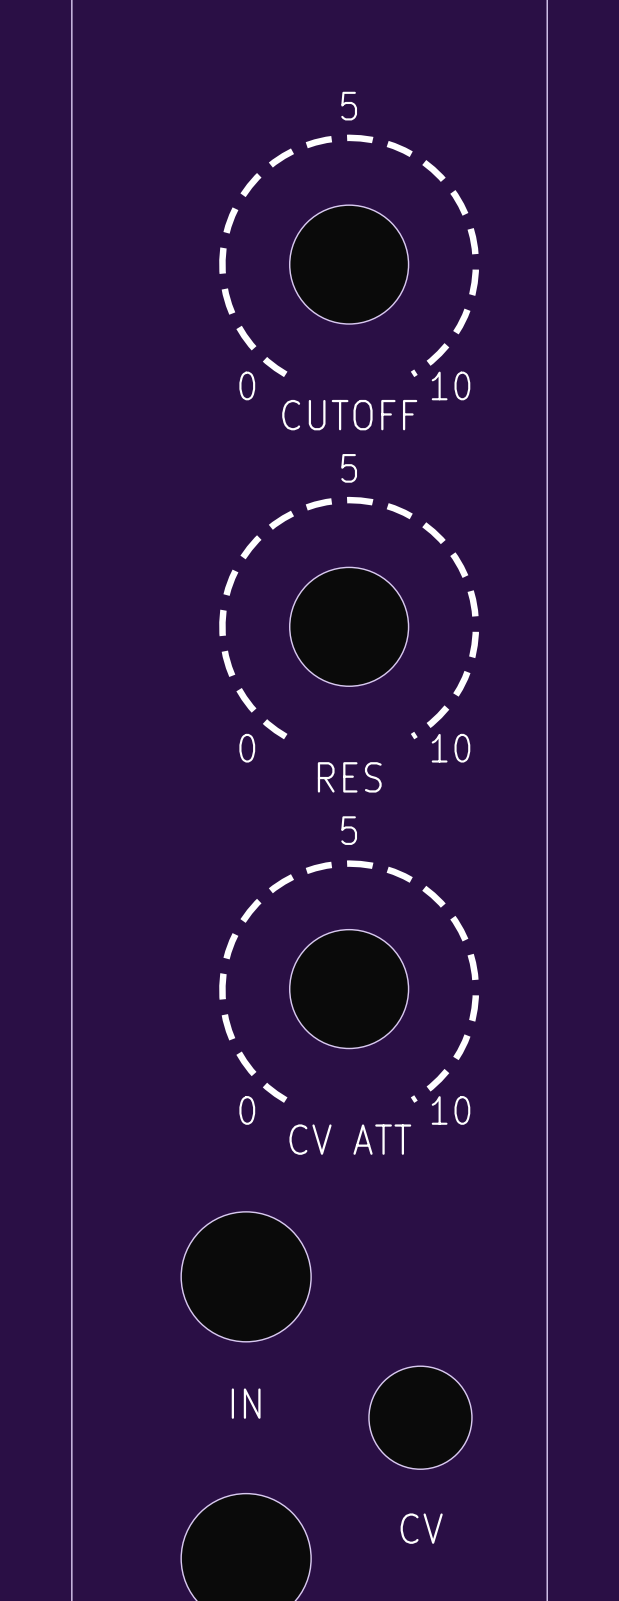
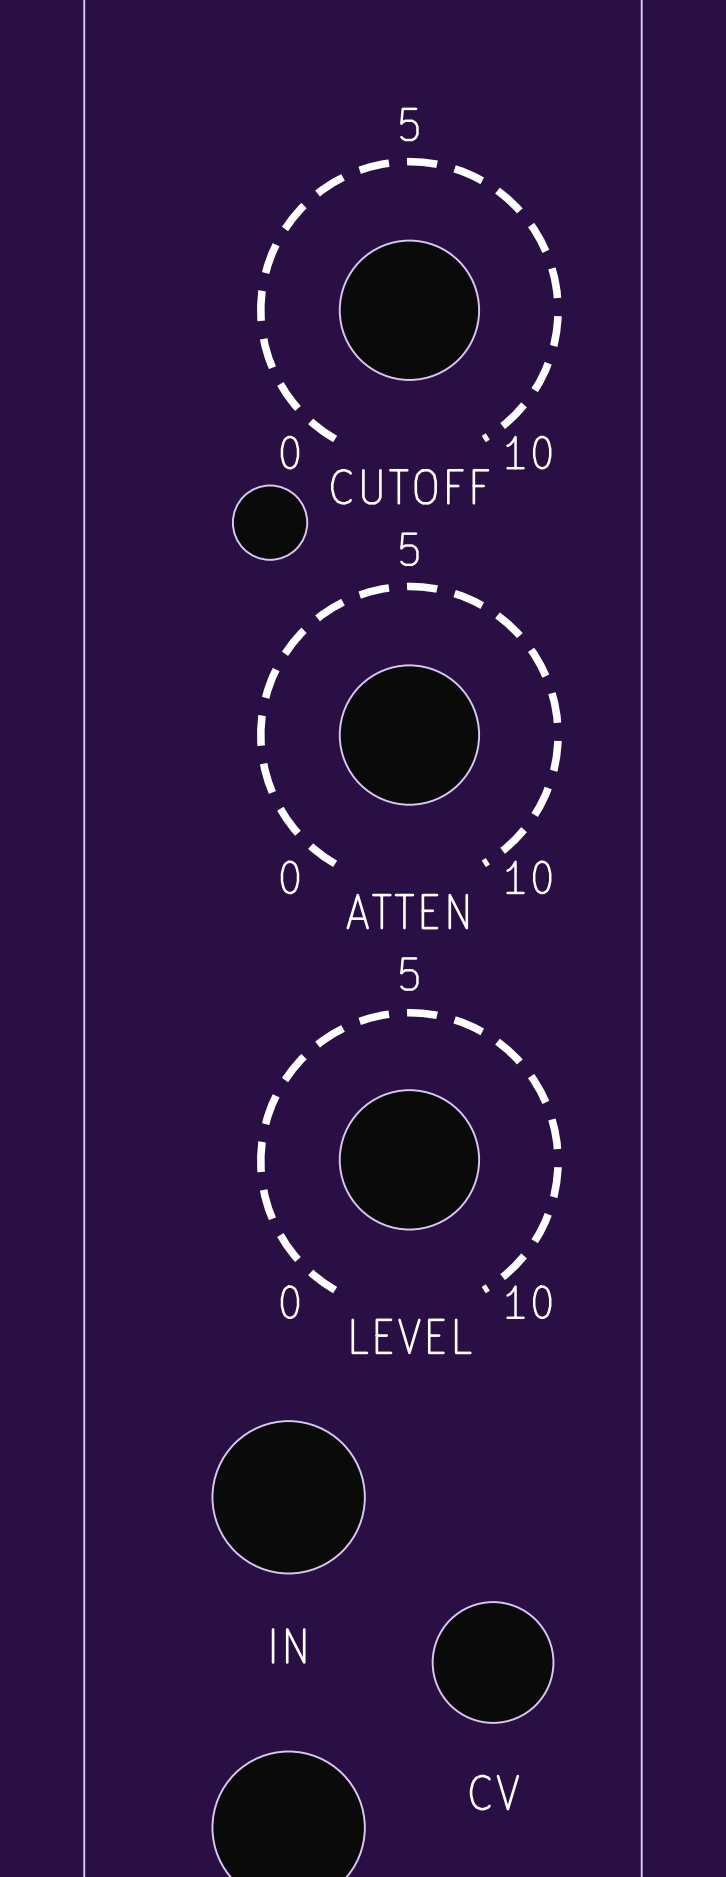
hole: none -> (270, 522)
text: RES (349, 777) -> ATTEN (407, 911)
text: CV ATT (350, 1139) -> LEVEL (411, 1336)

